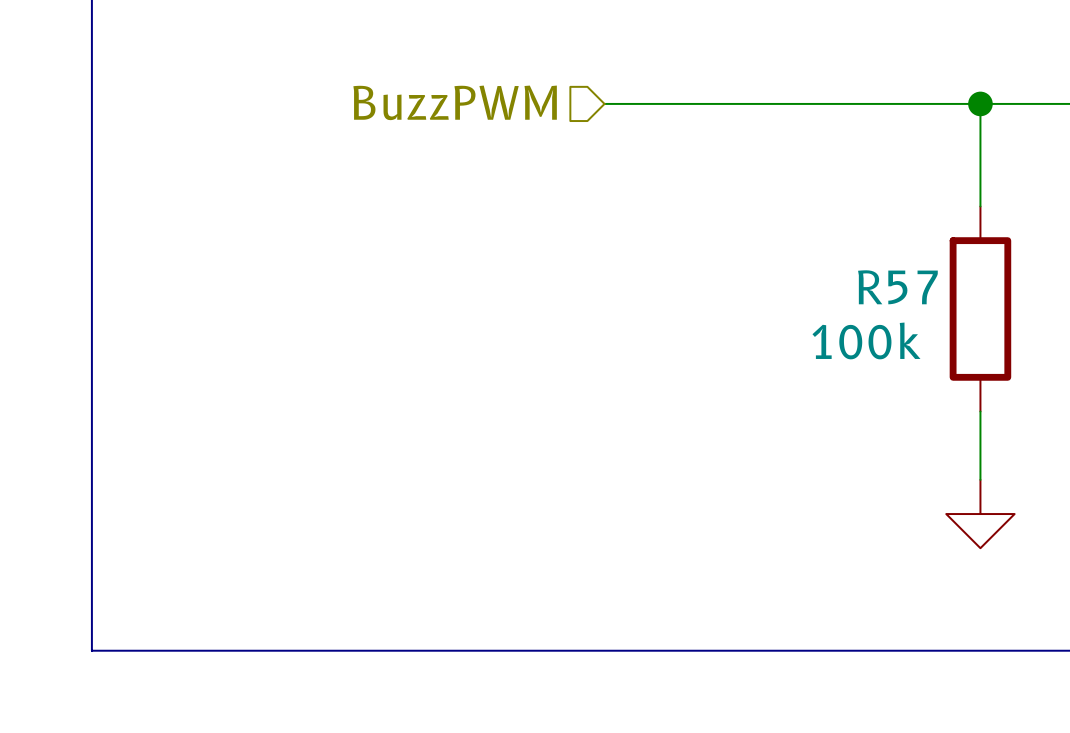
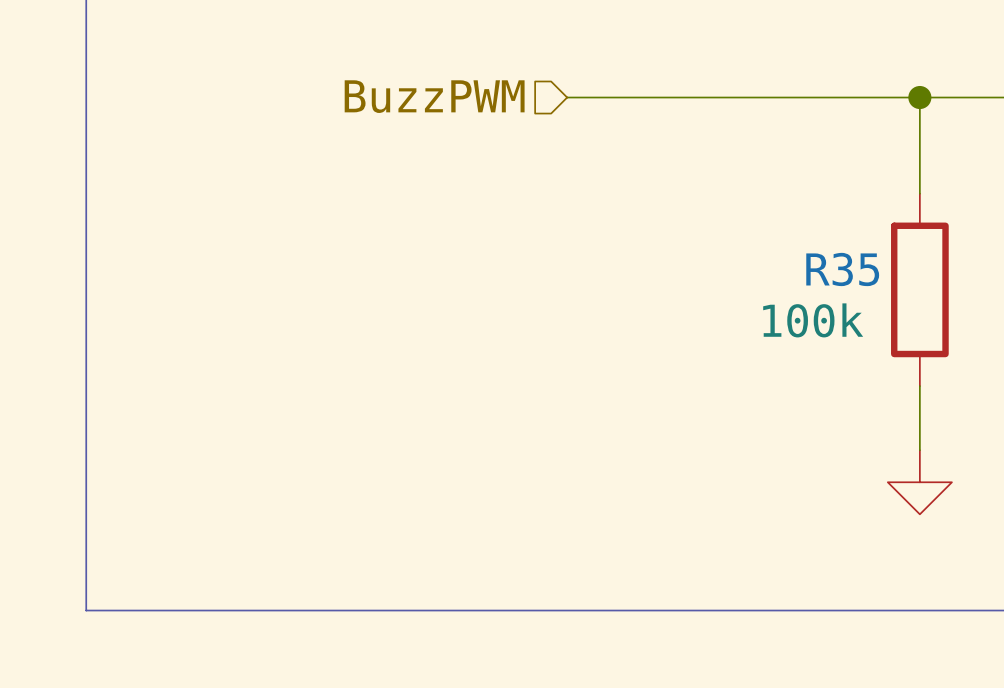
R57 name: R57 (897, 287) -> R35 (842, 269)

